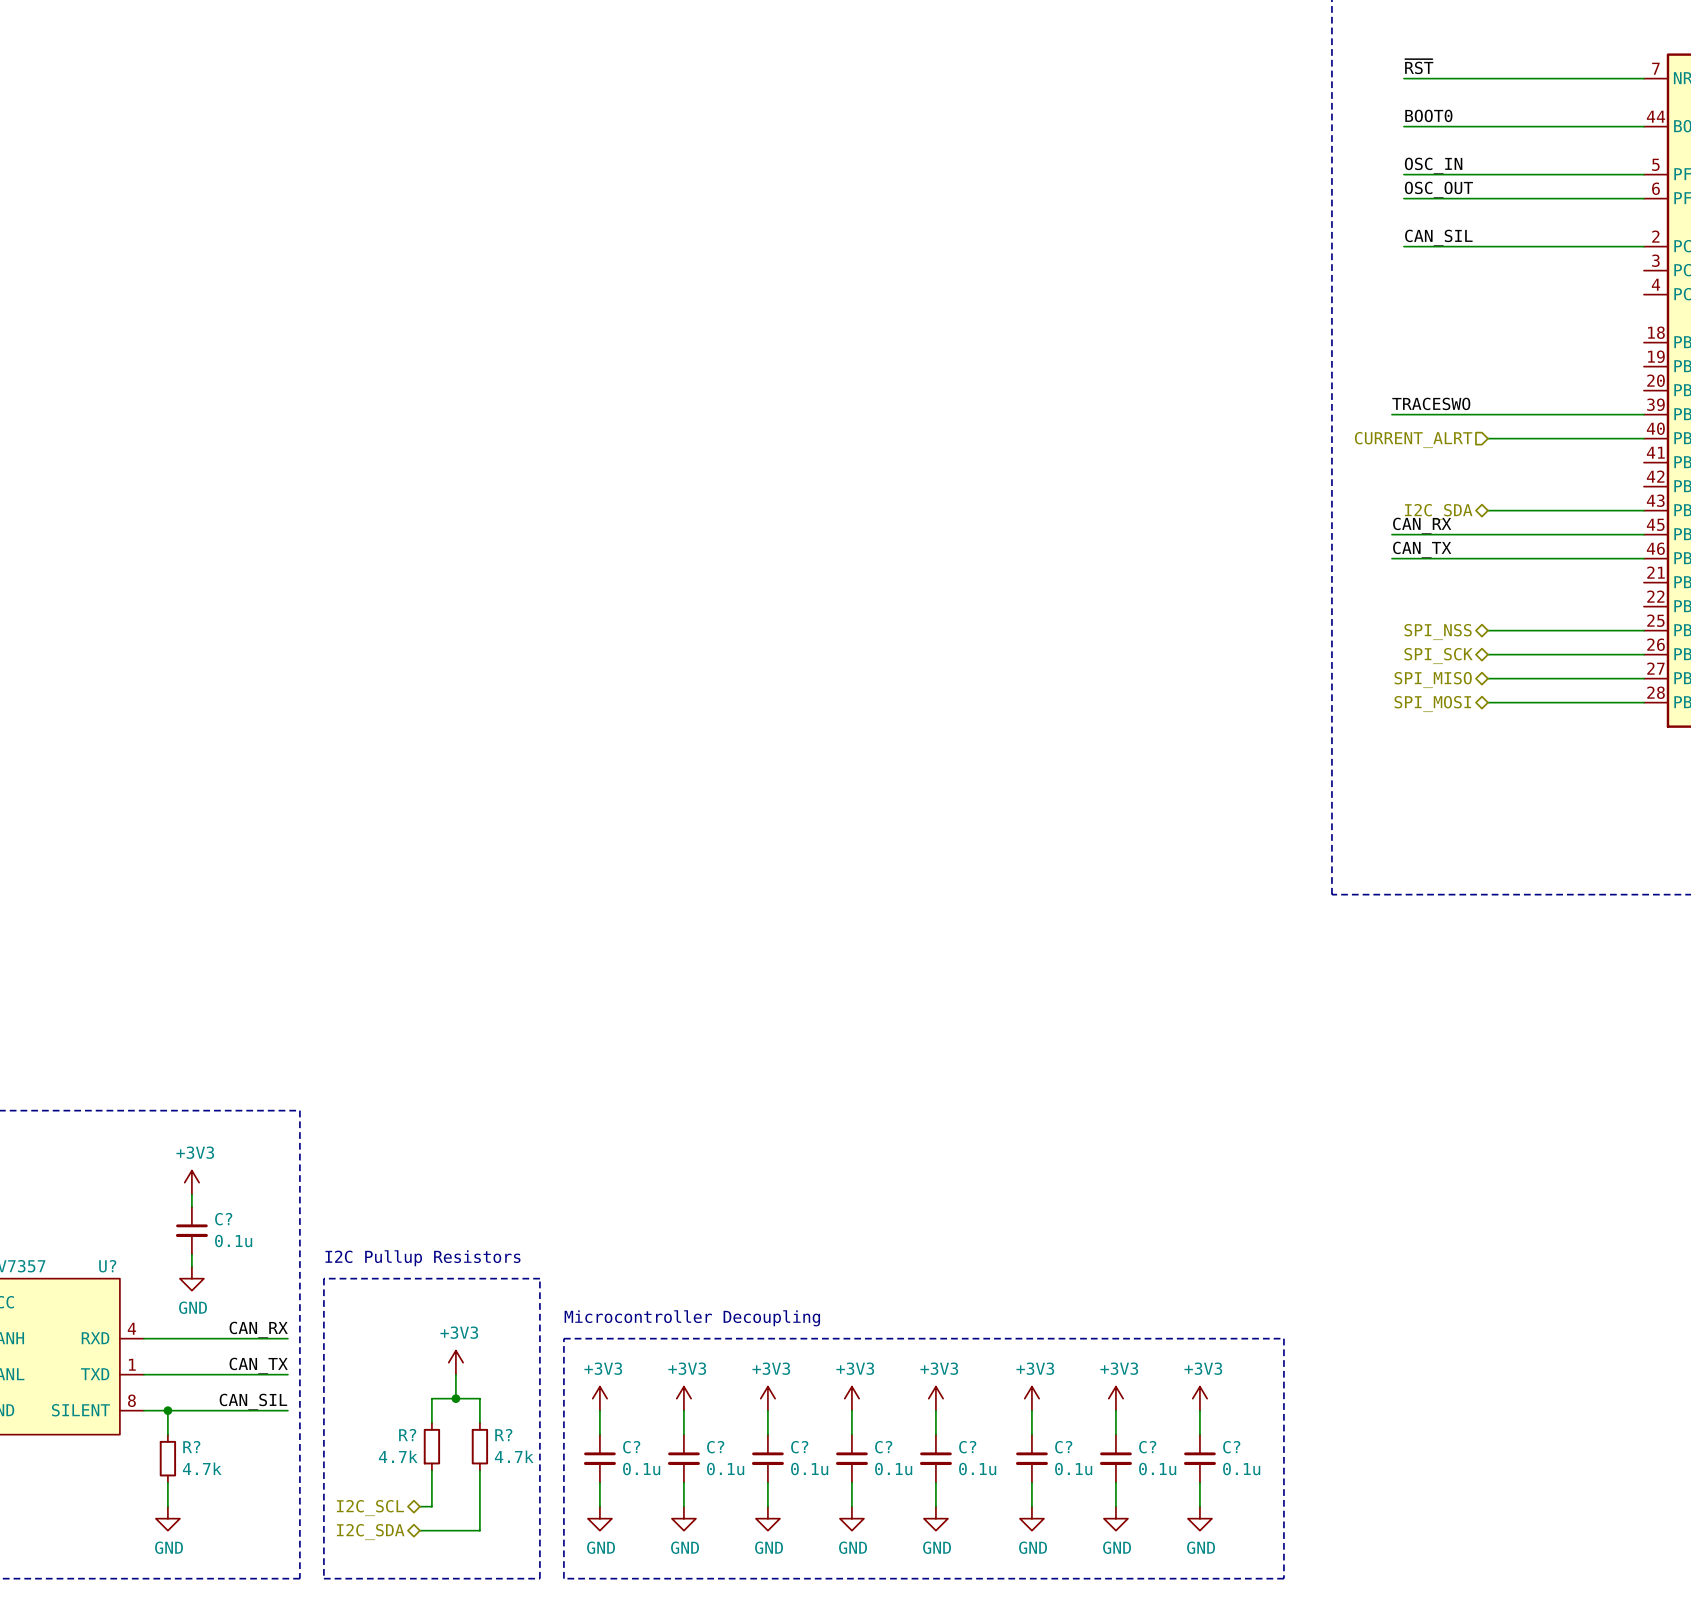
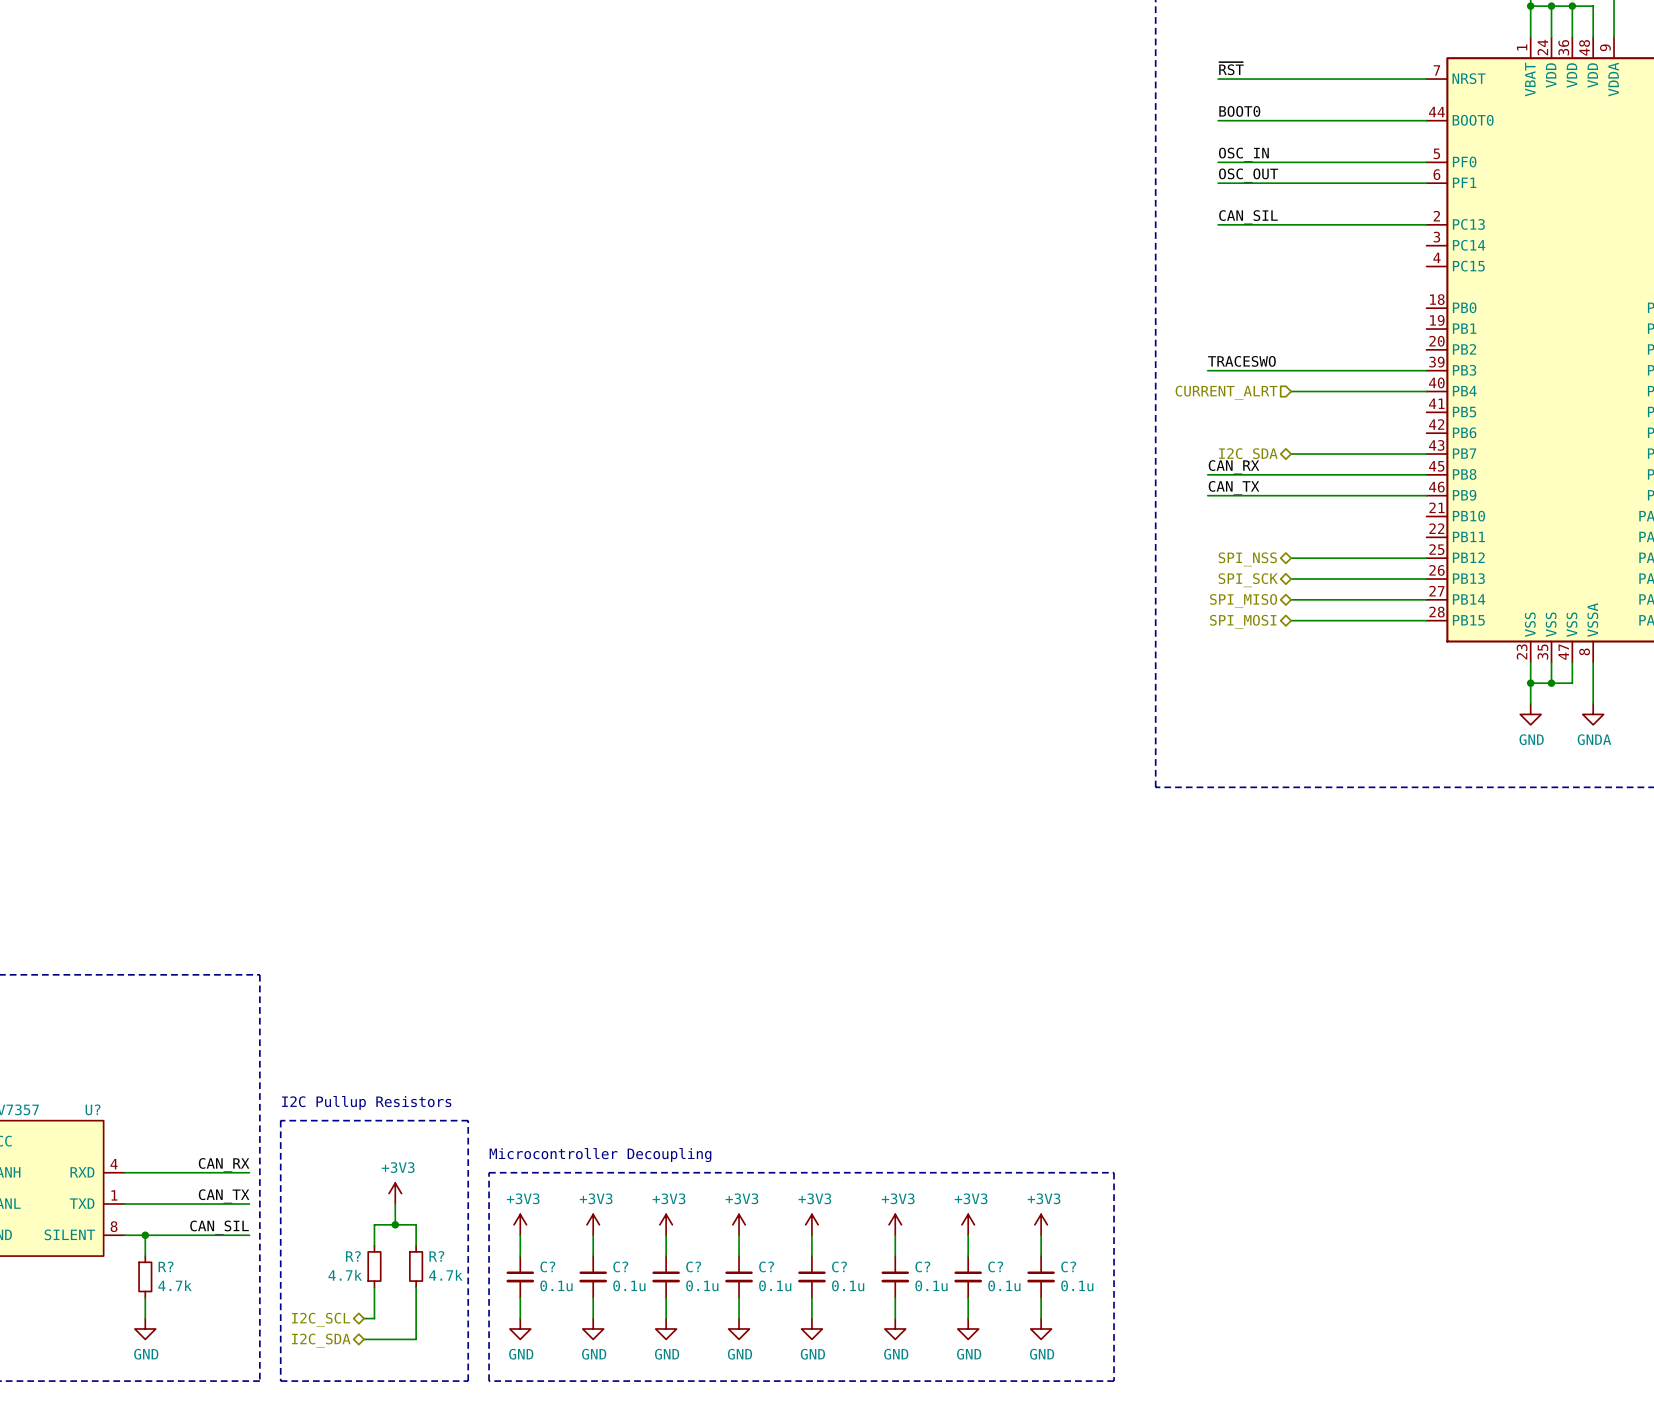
power symbol: +3V3 (191, 1182) -> none
wire: (191, 1194) (191, 1206) -> none
C?: 0.1u (191, 1230) -> none
wire: (191, 1254) (191, 1266) -> none
power symbol: GND (191, 1278) -> none

